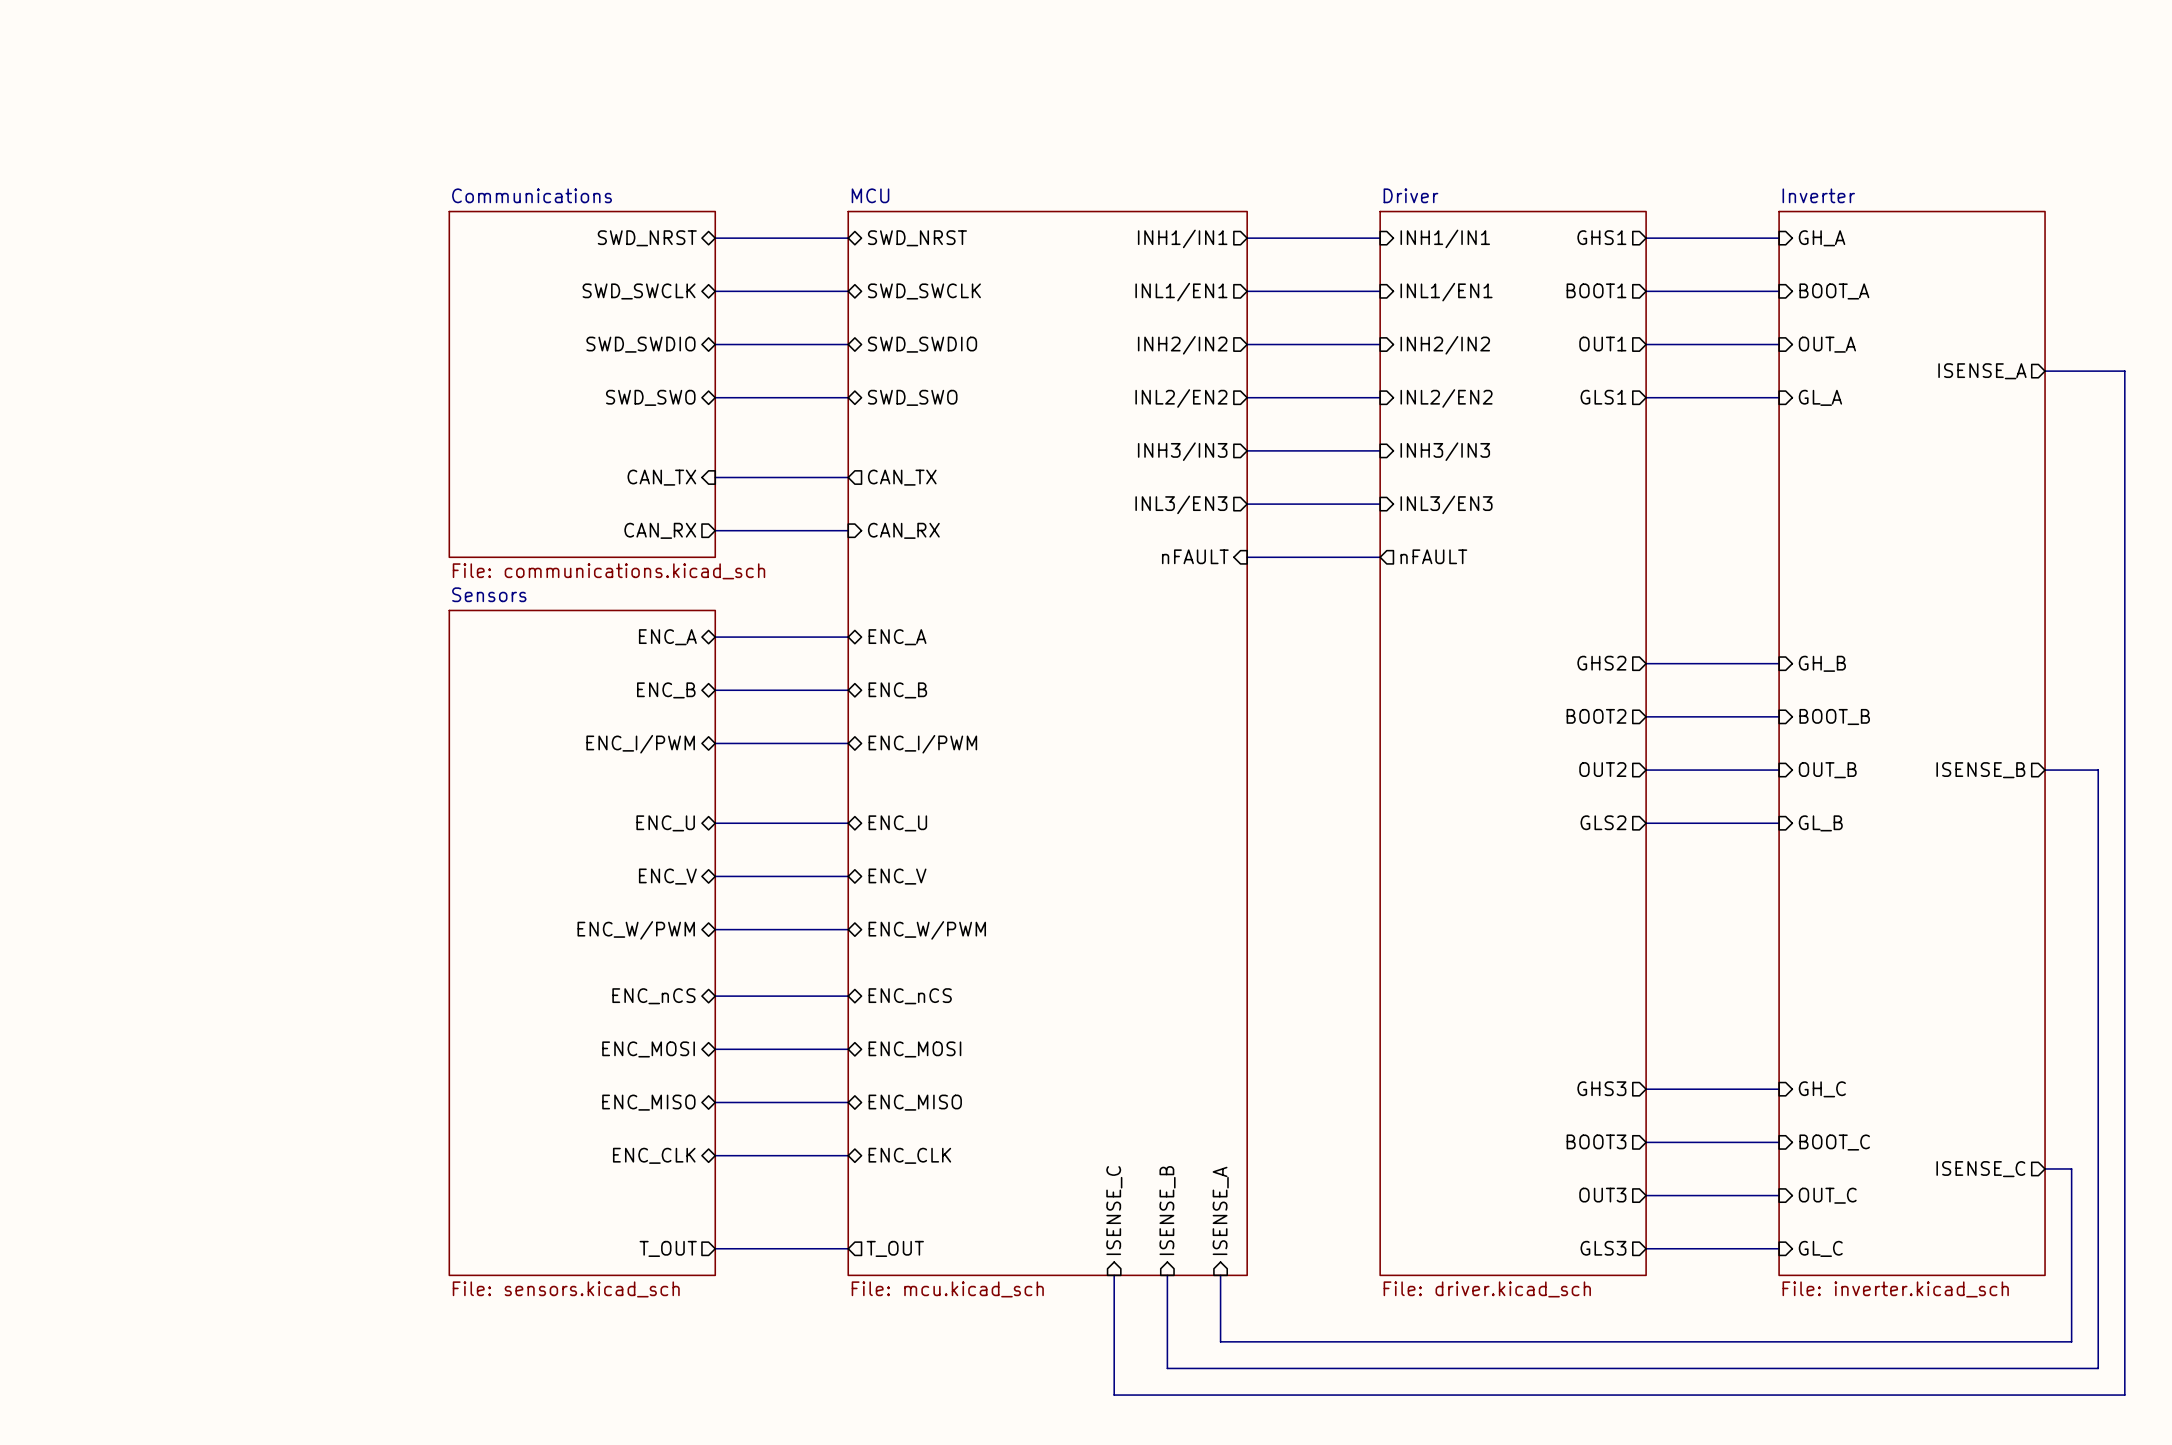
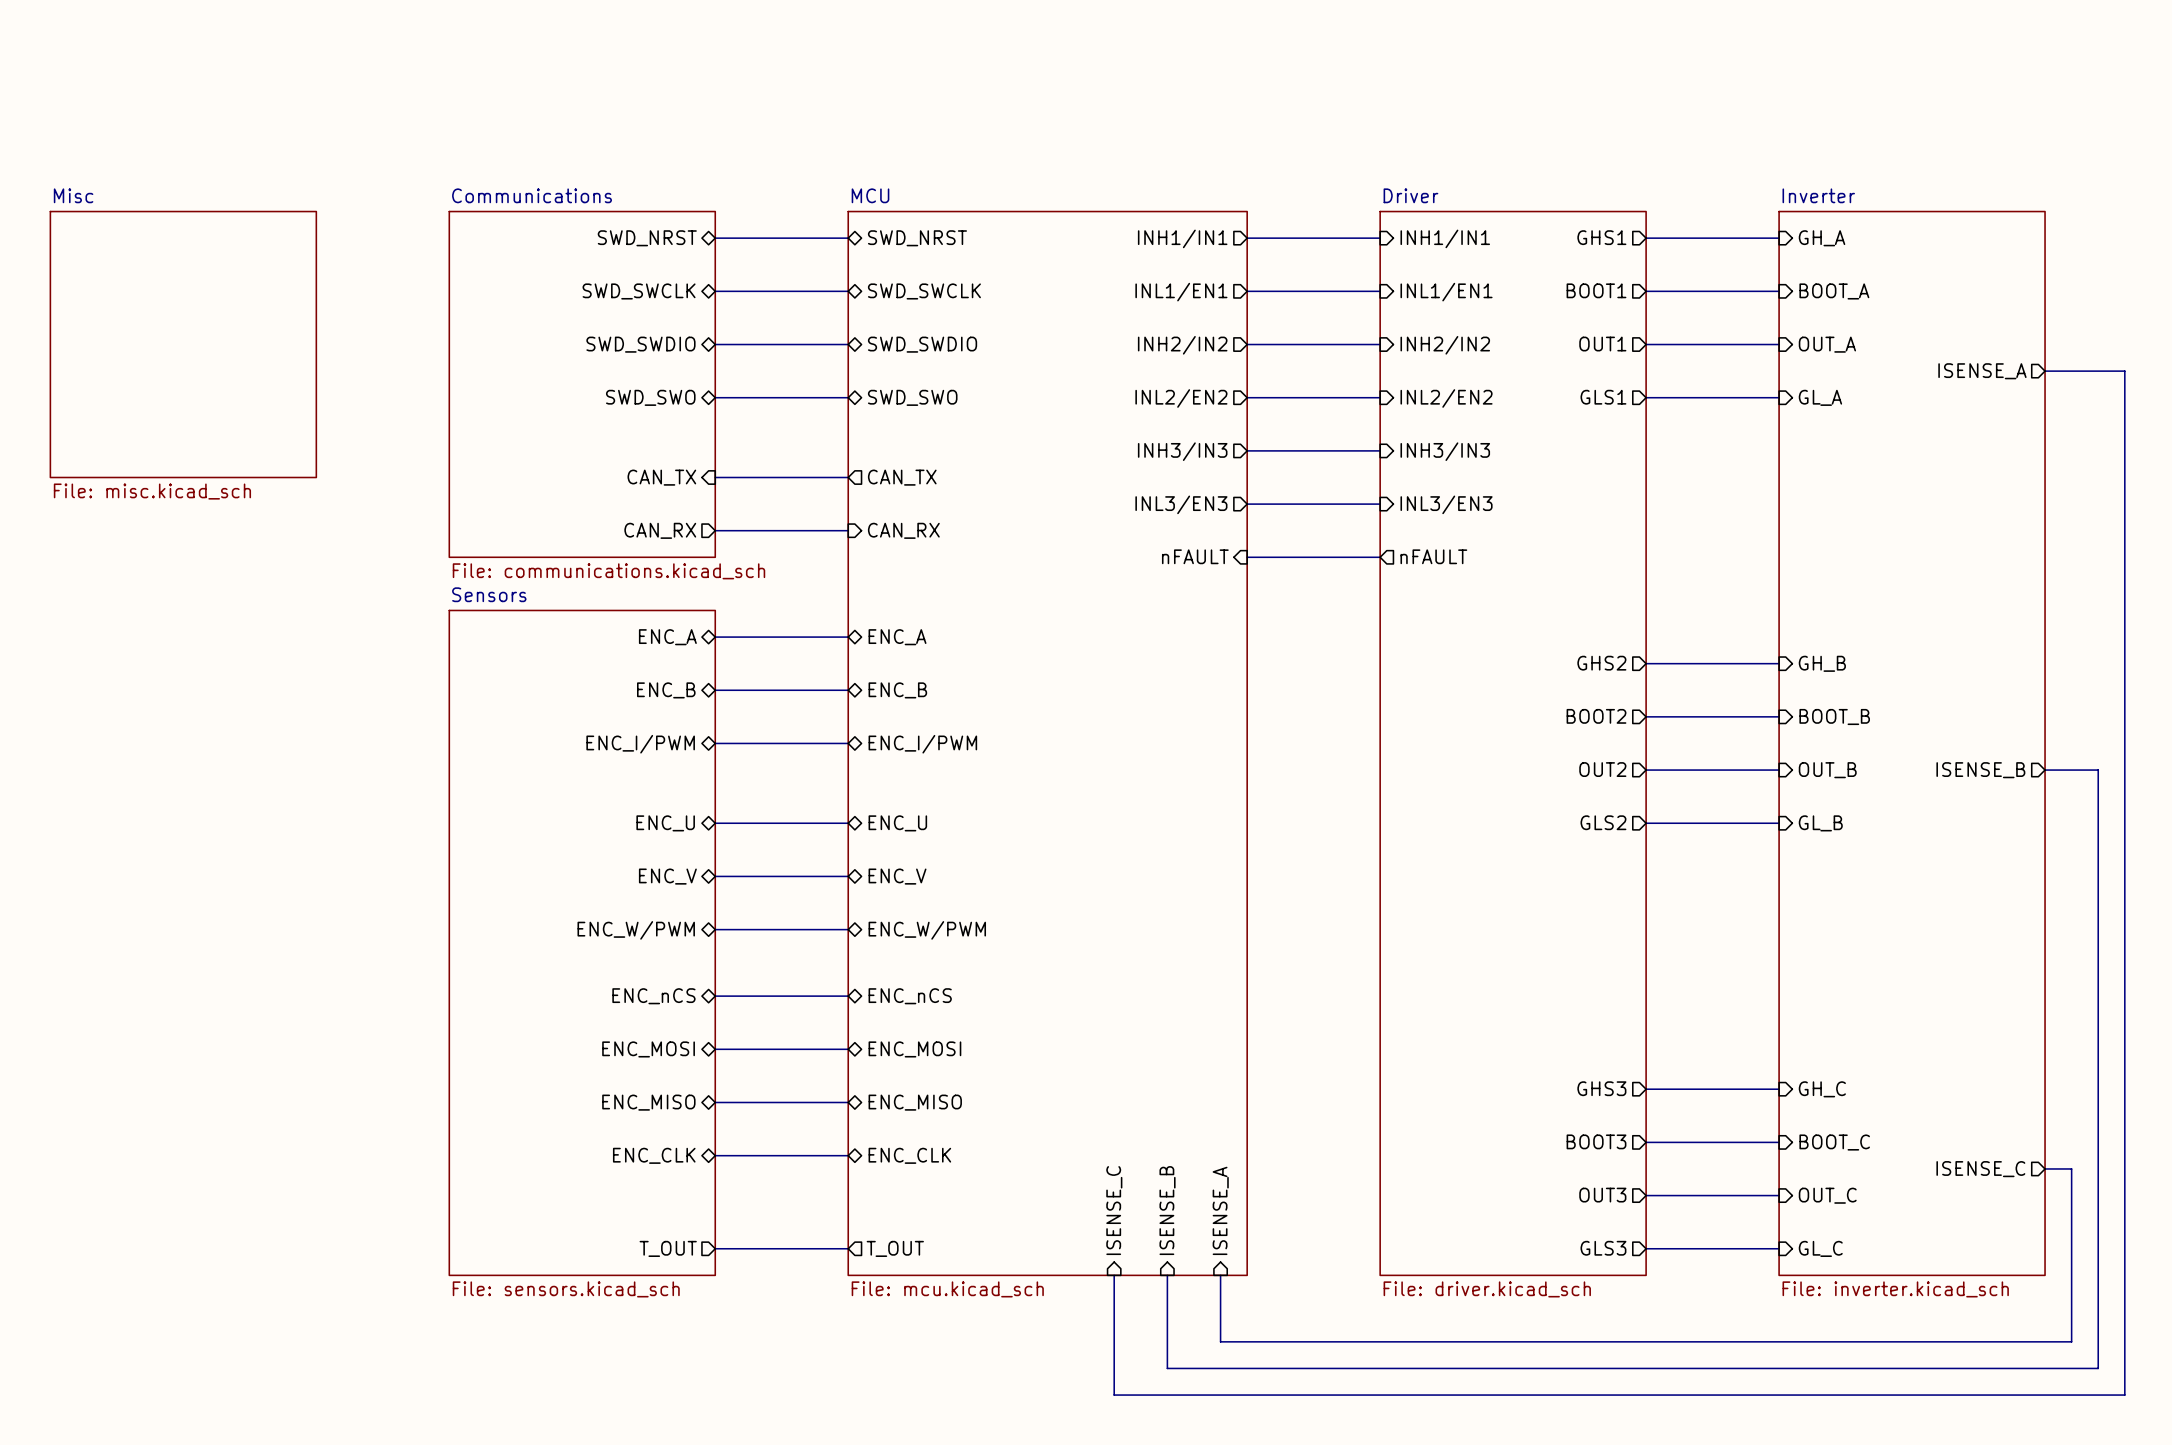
sheet Misc: none -> File: misc.kicad_sch (183, 344)

